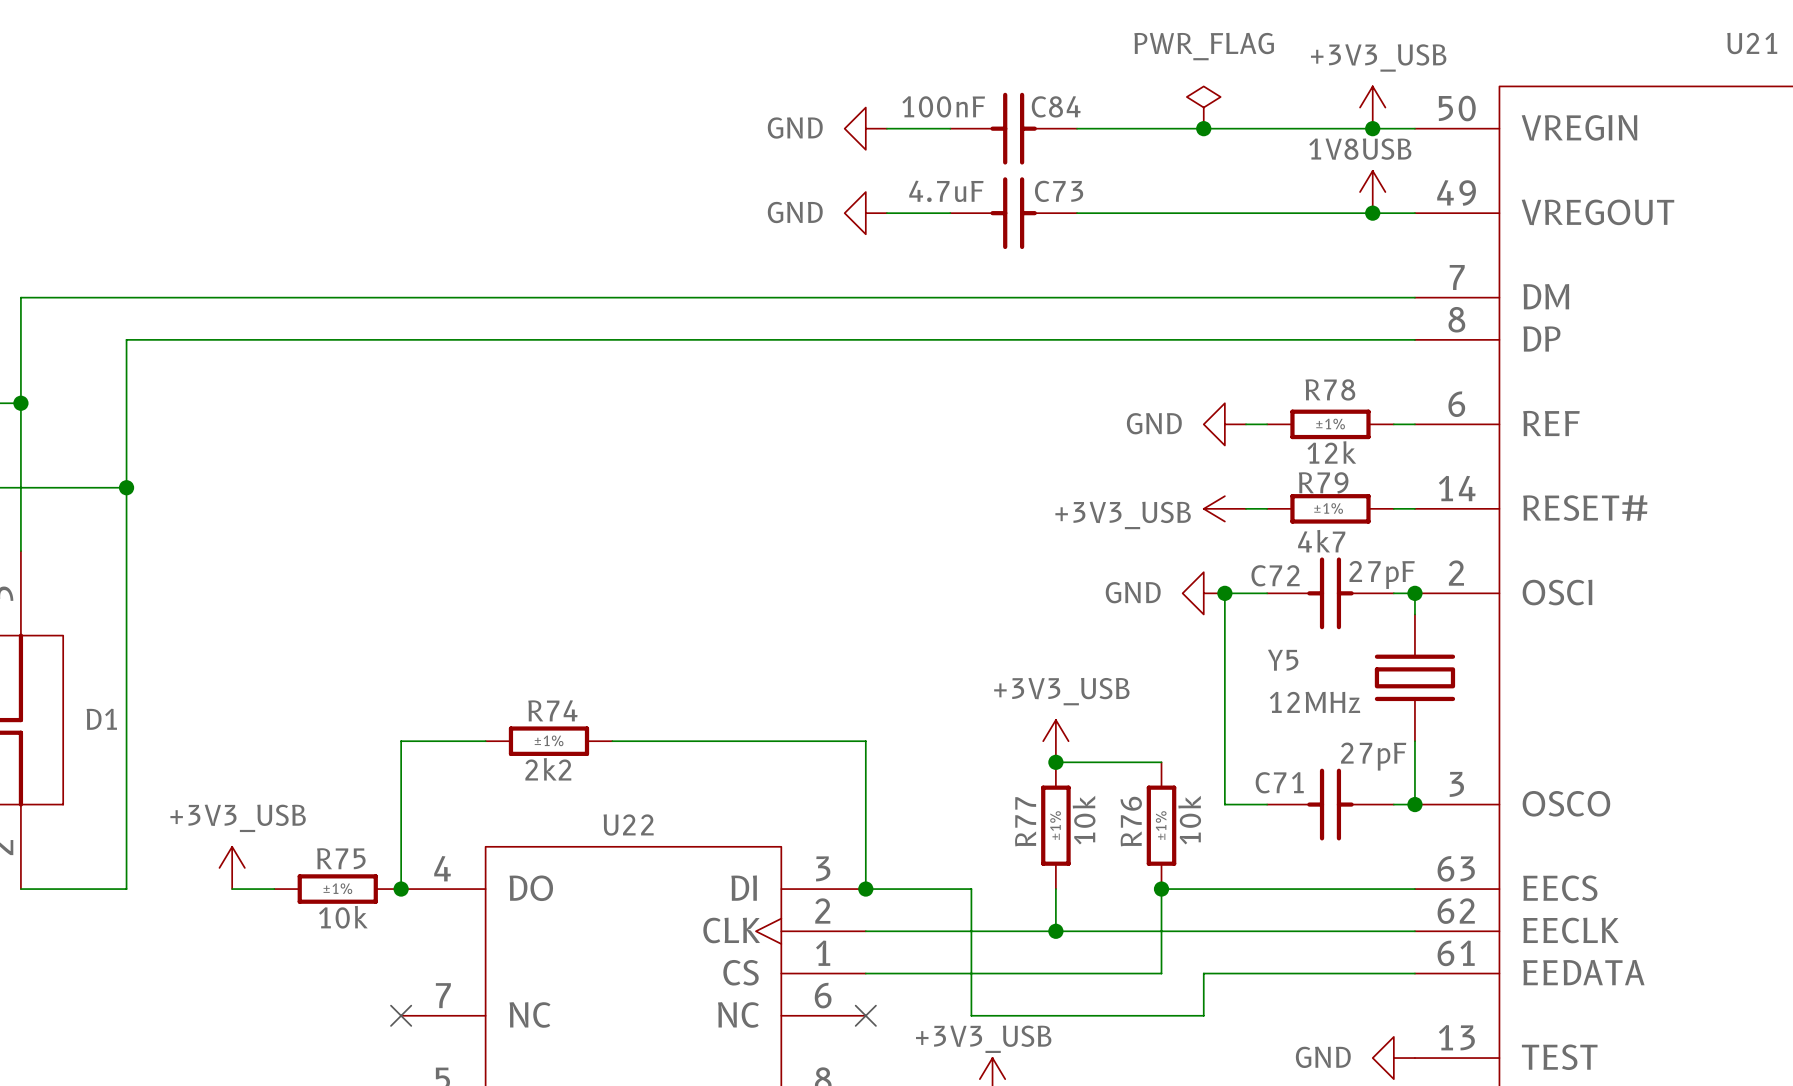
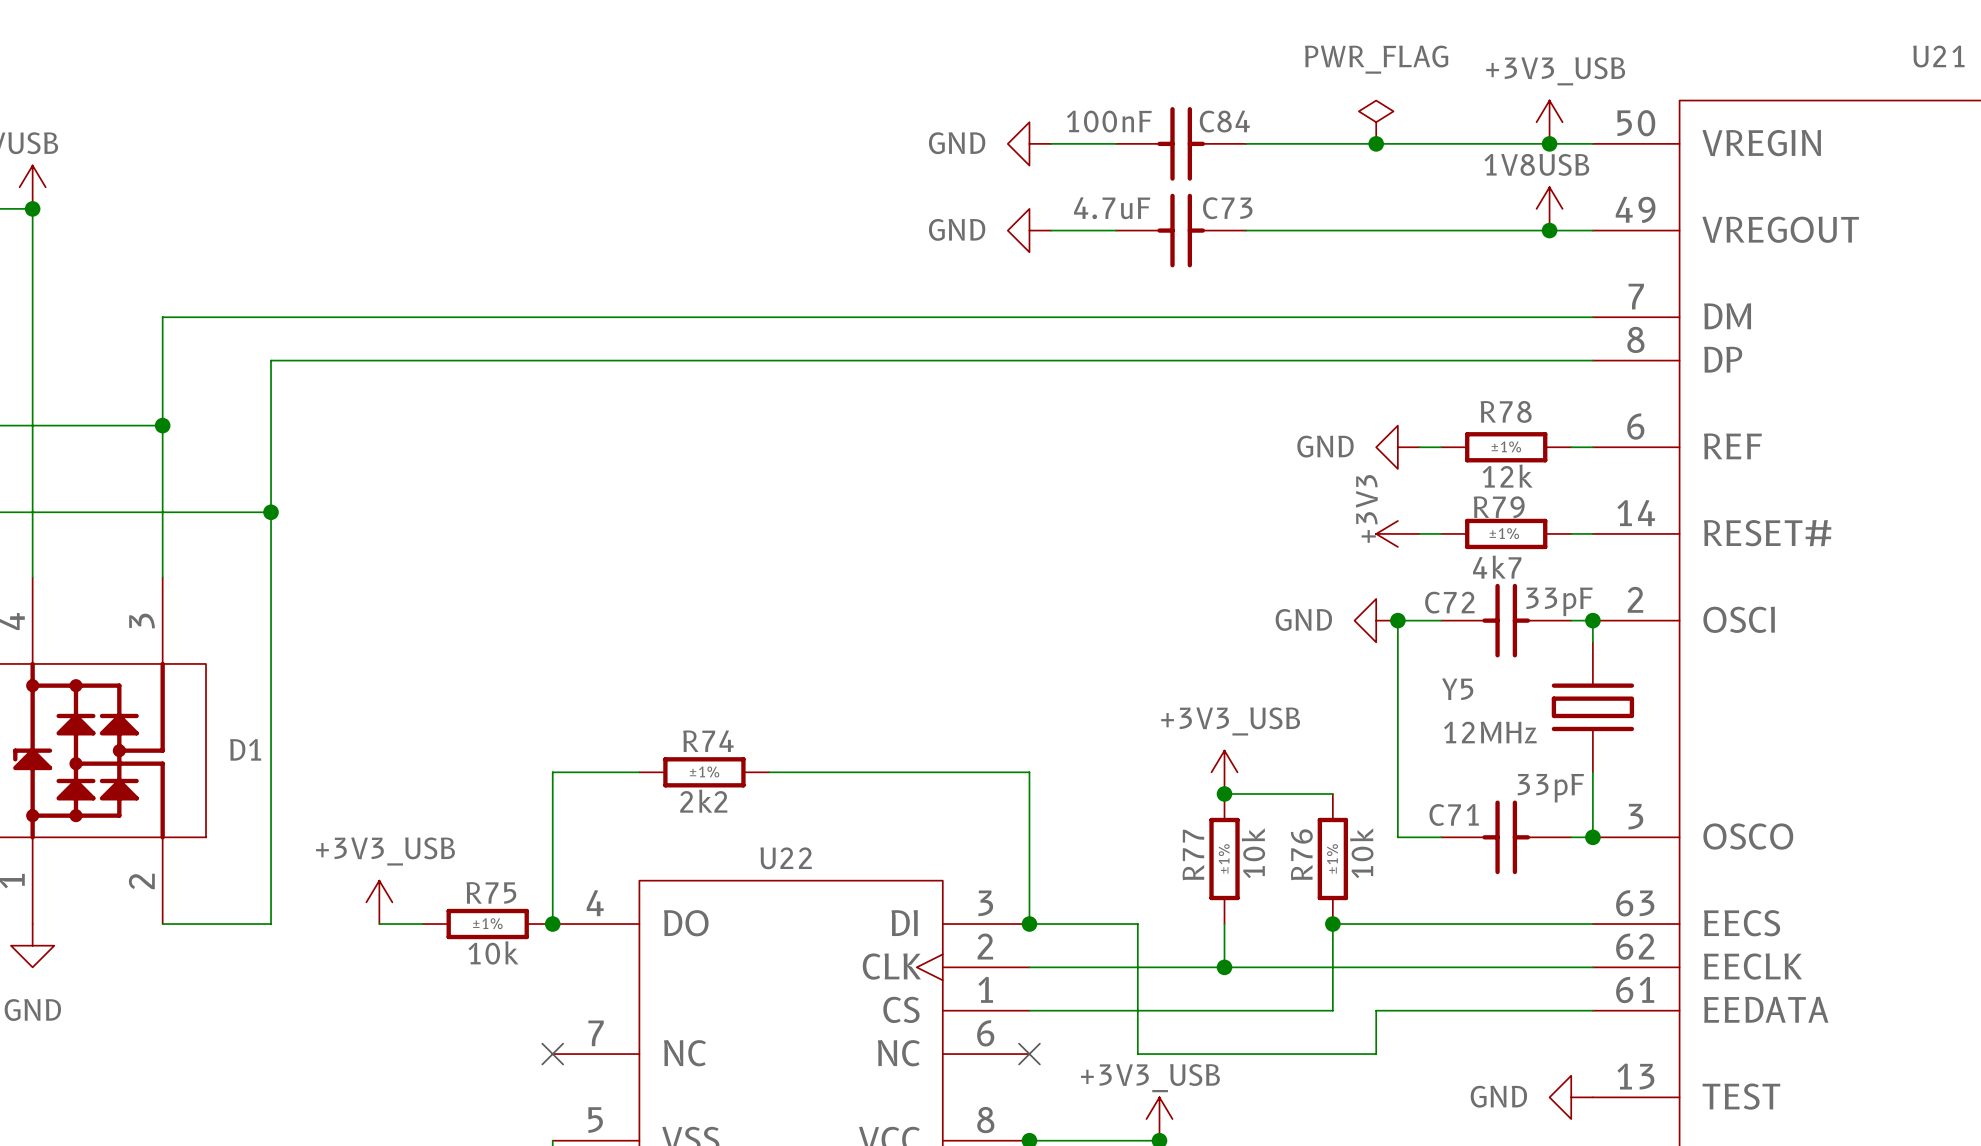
power symbol: +3V3_USB (1224, 508) -> +3V3 (1397, 533)
C72 text: 27pF (1382, 574) -> 33pF (1559, 601)
C71 text: 27pF (1373, 756) -> 33pF (1550, 788)

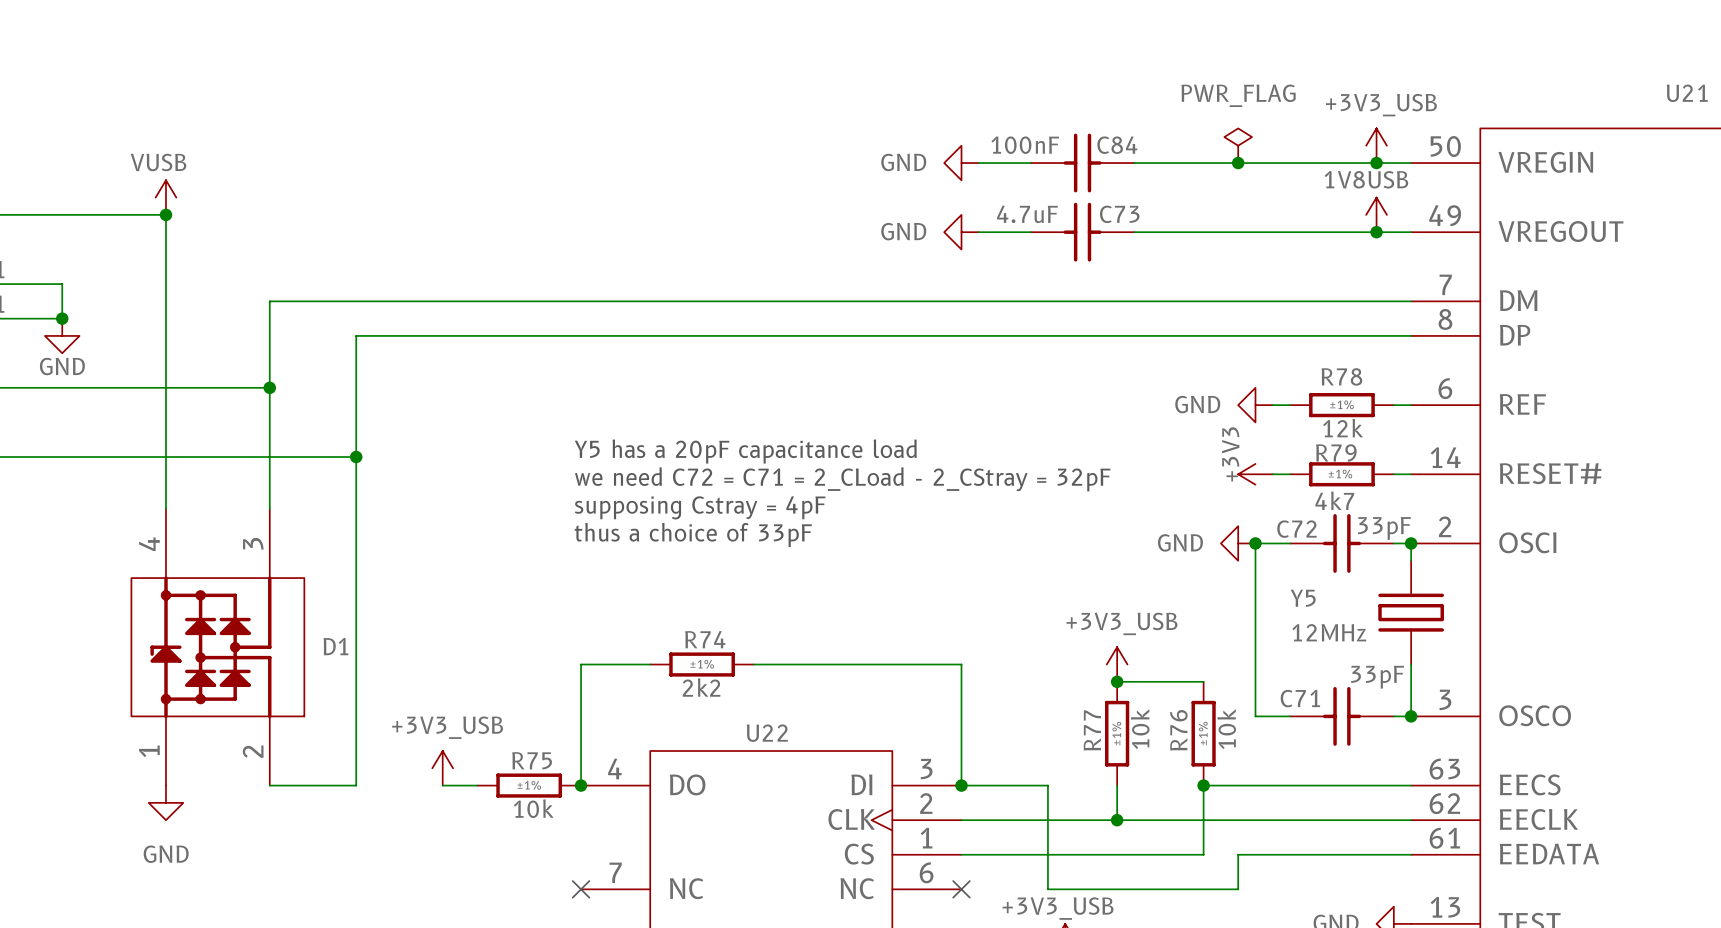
text: none -> Y5 has a 20pF capacitance load (745, 451)
text: none -> we need C72 = C71 = 2_CLoad - 2_CStray = 32pF (842, 479)
text: none -> supposing Cstray = 4pF (700, 507)
text: none -> thus a choice of 33pF (693, 535)

